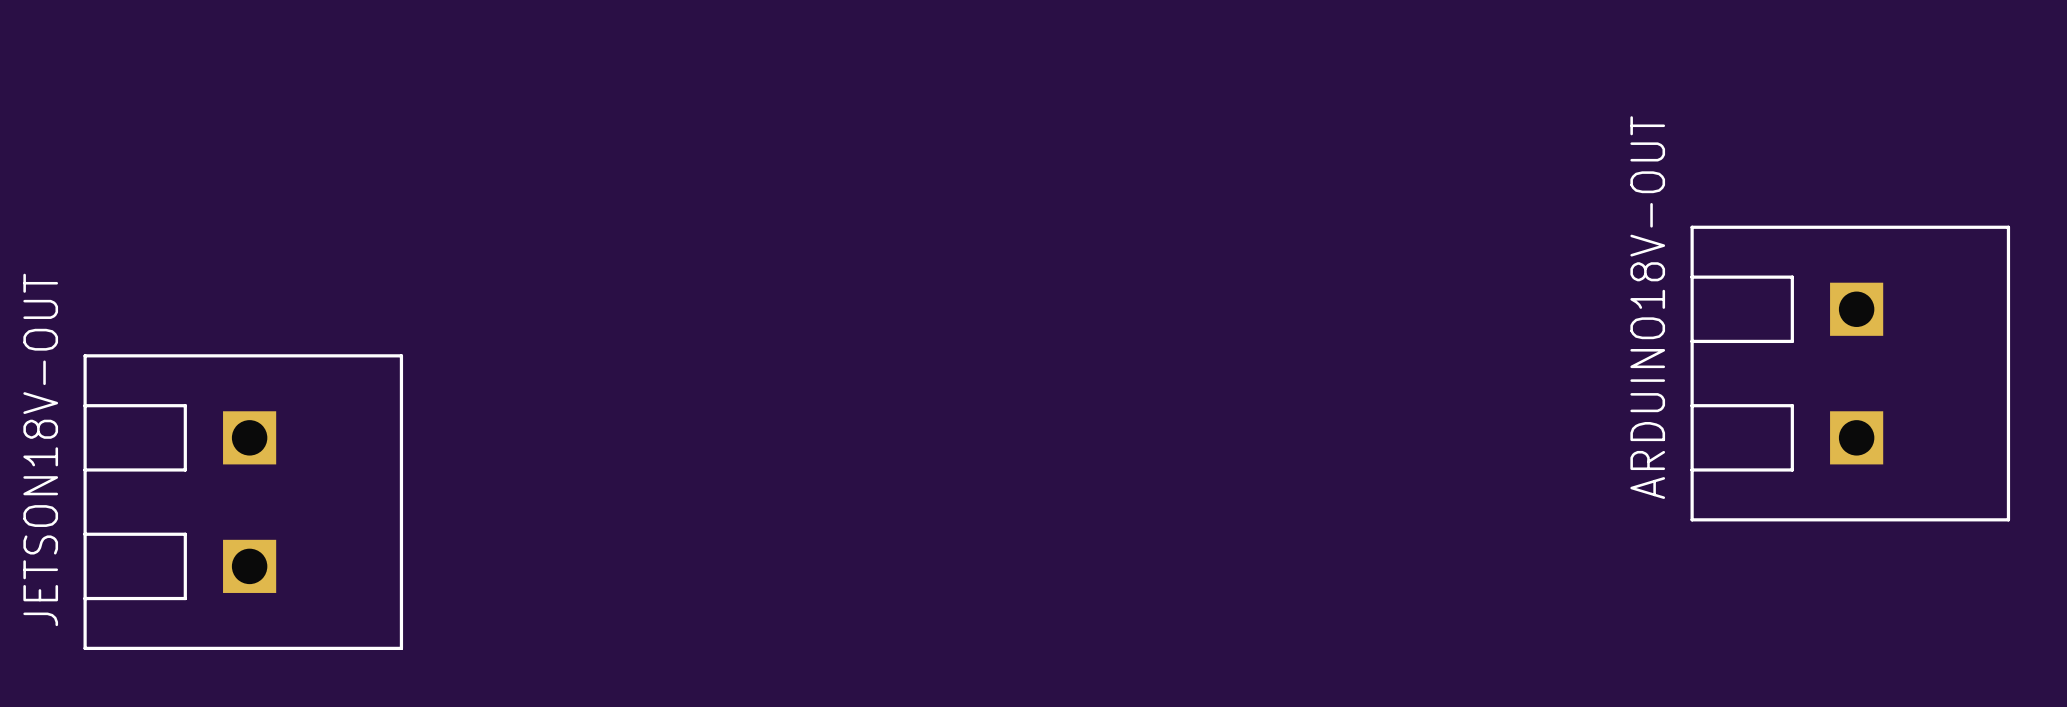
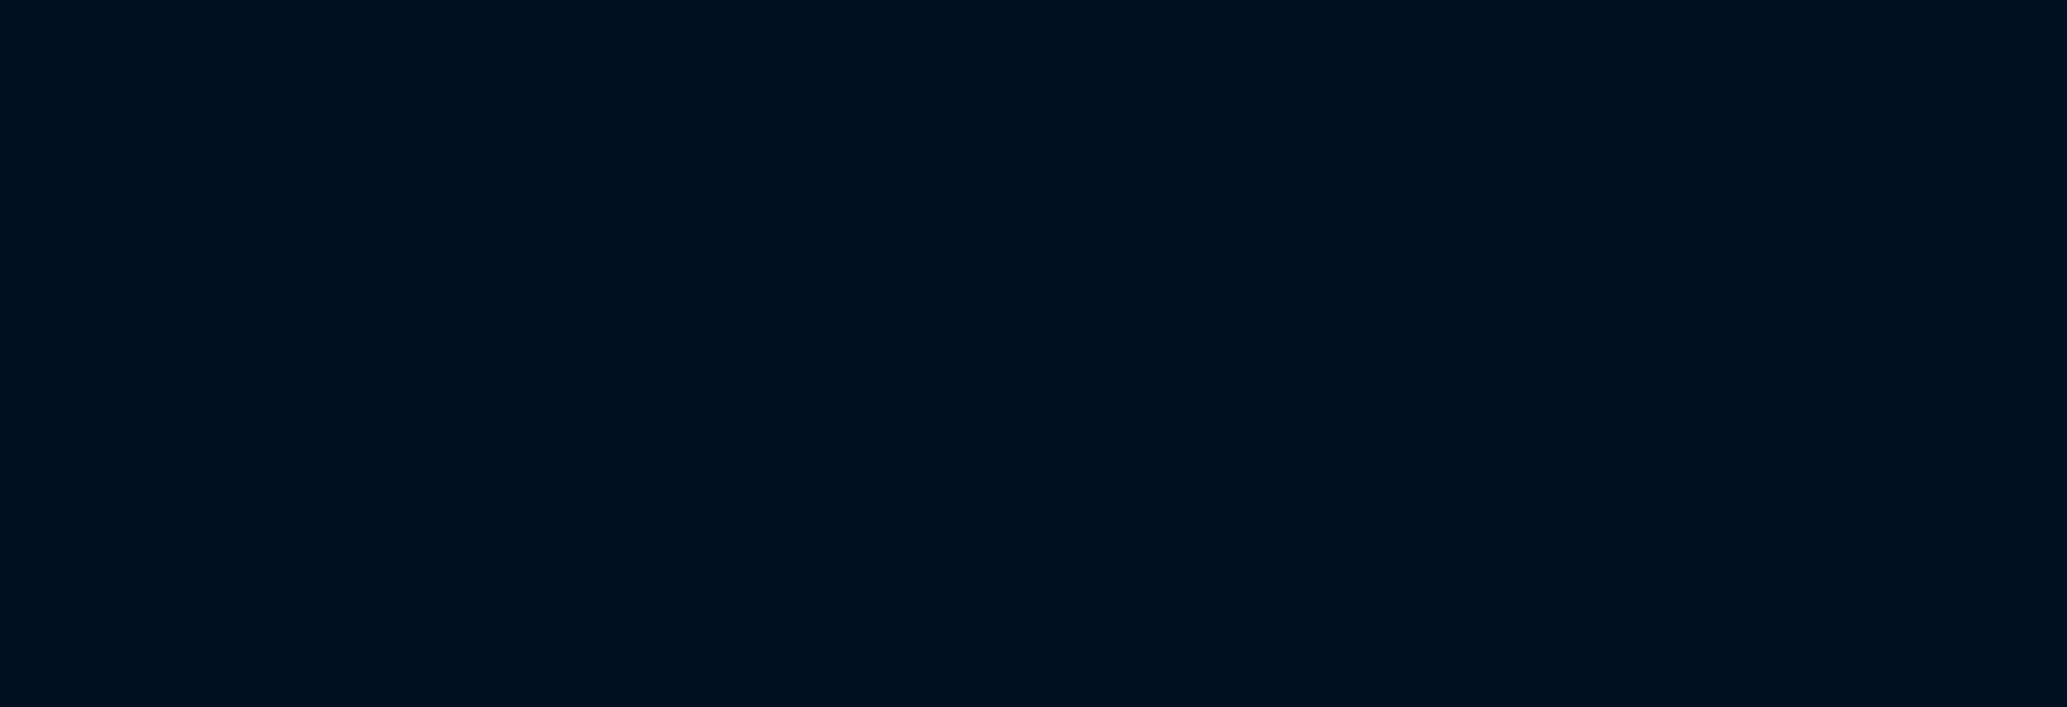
ARDUINO18V-OUT: (1850, 373) -> none
JETSON18V-OUT: (243, 502) -> none

